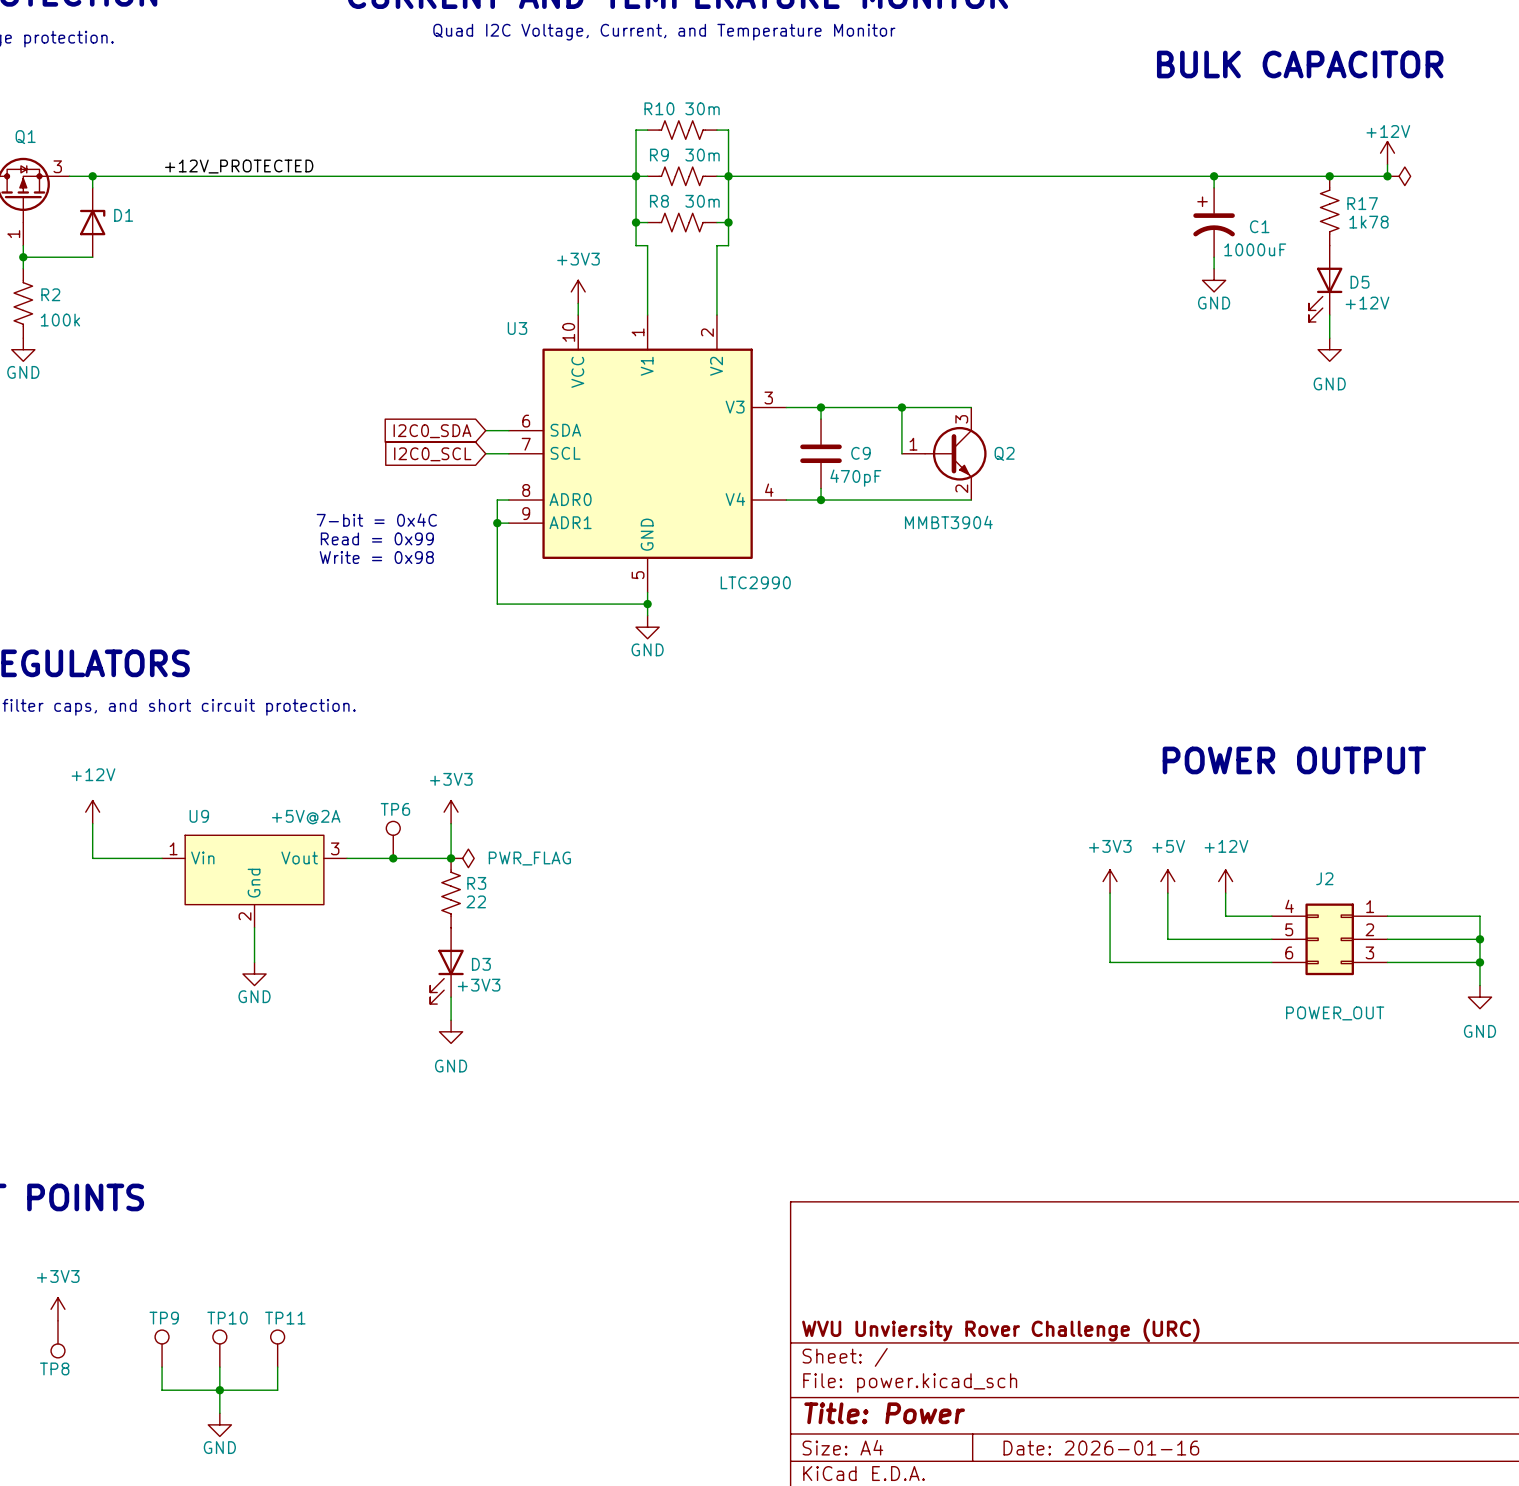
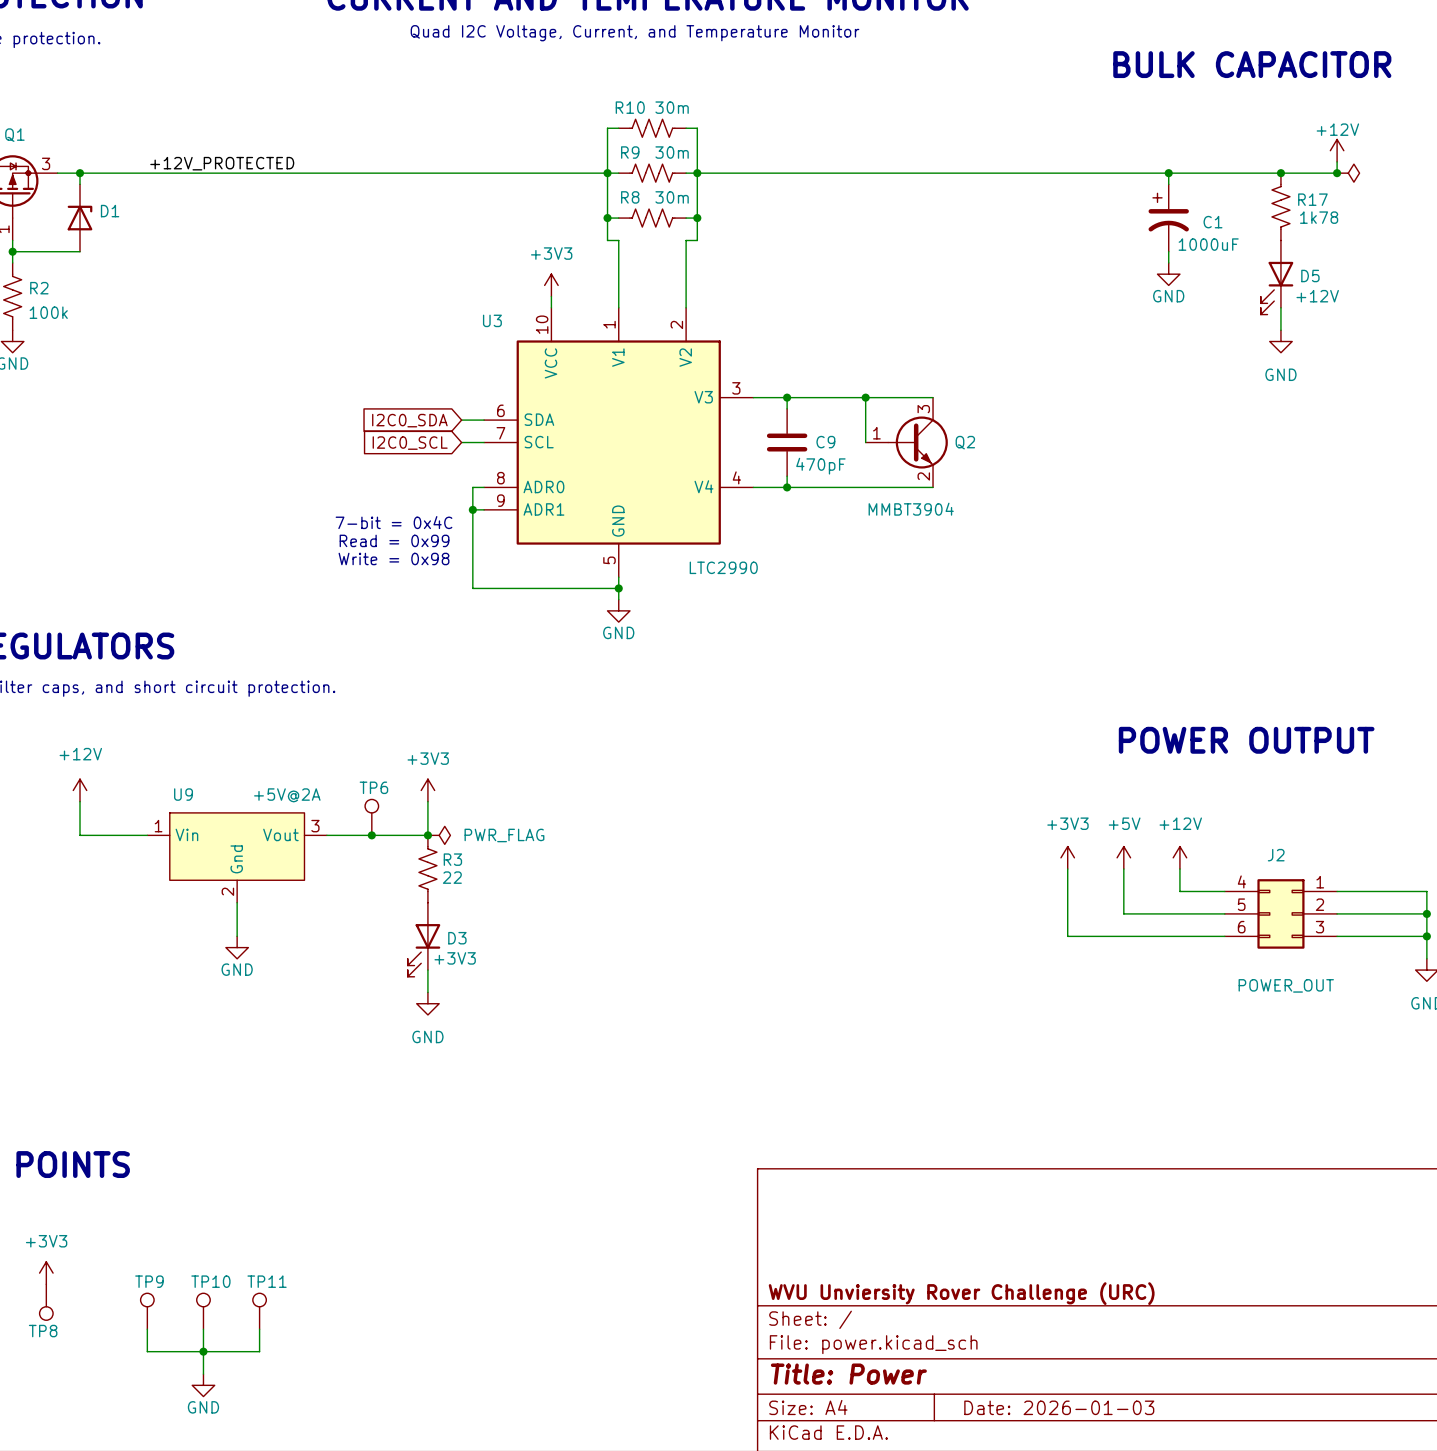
text position: 7-bit = 0x4C (376, 520) -> 7-bit = 0x4C (394, 522)
text position: Read = 0x99 (377, 538) -> Read = 0x99 (394, 540)
text position: Write = 0x98 (376, 557) -> Write = 0x98 (394, 558)
title block: Date: 2026-01-16 (1101, 1448) -> Date: 2026-01-03 (1059, 1407)

